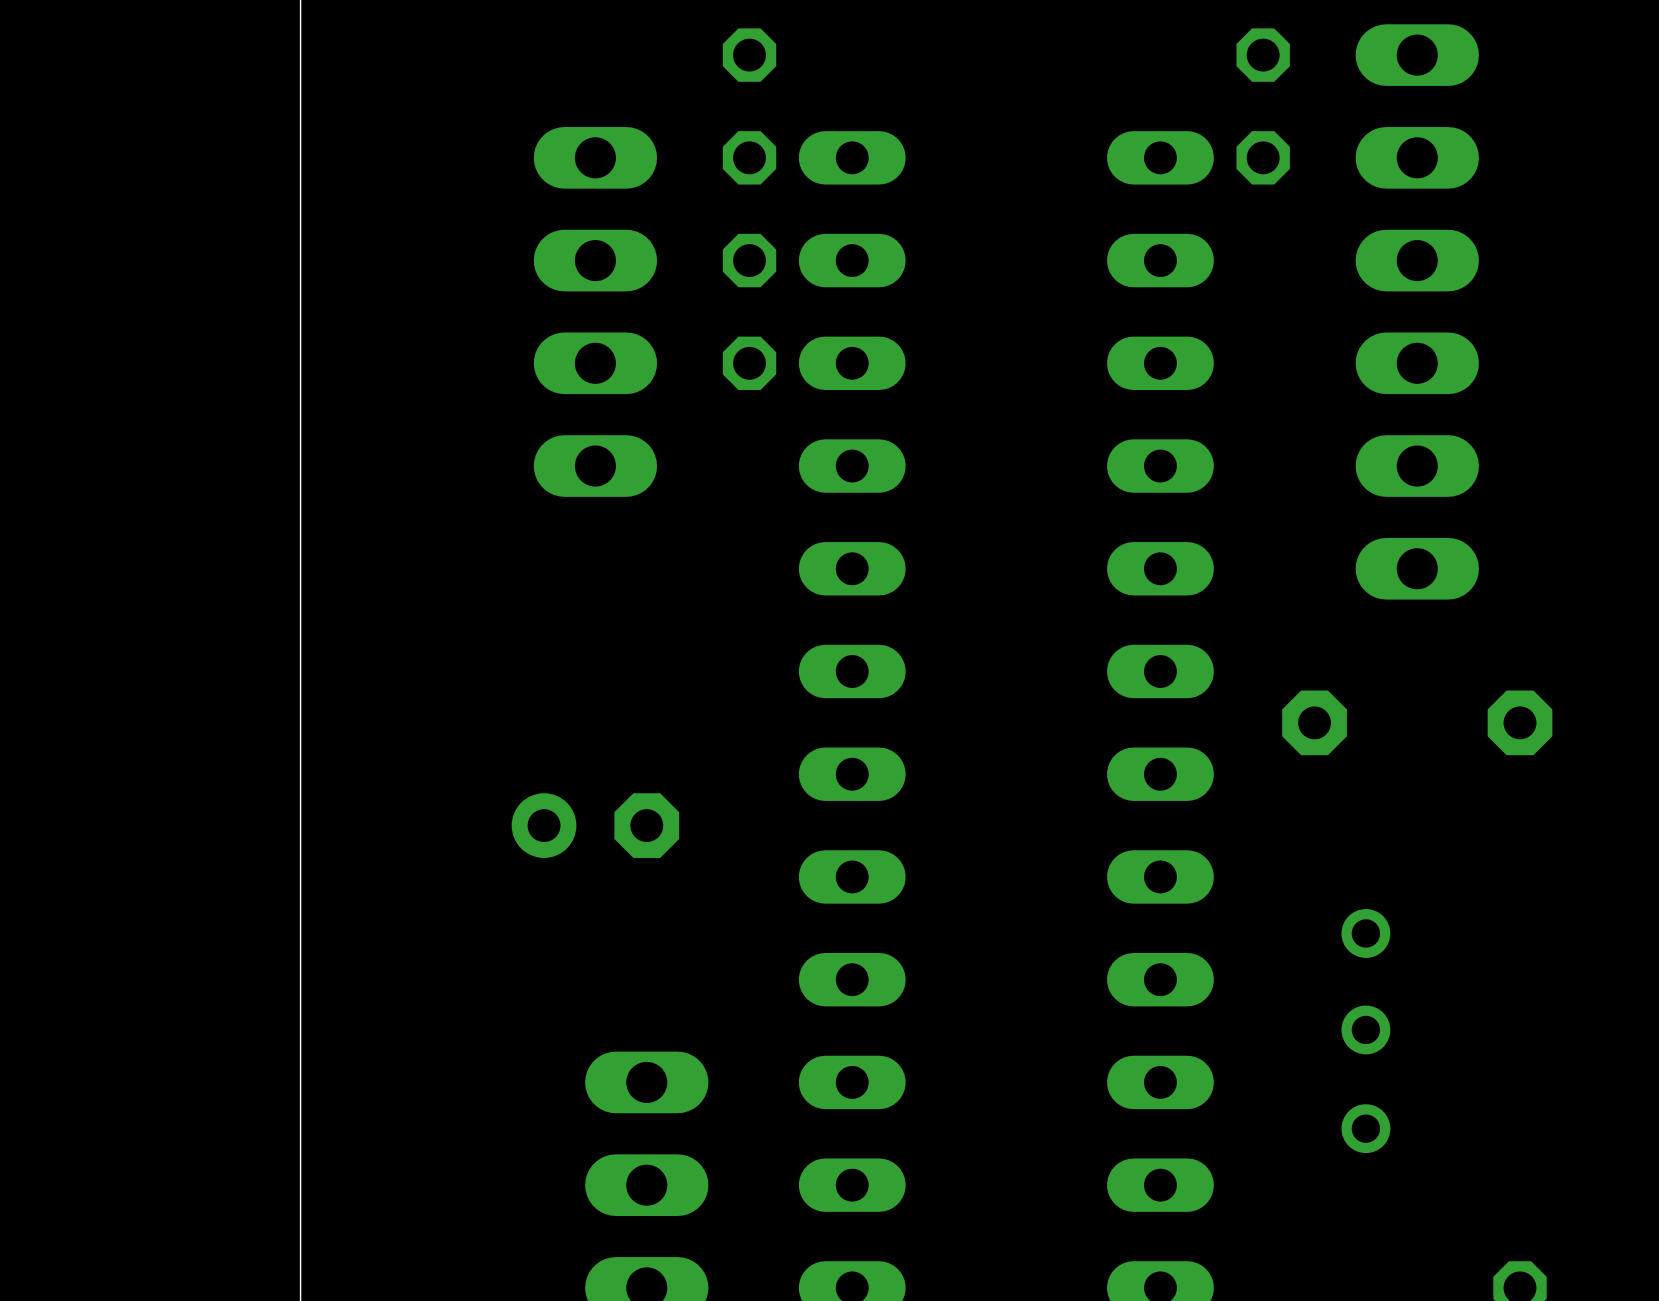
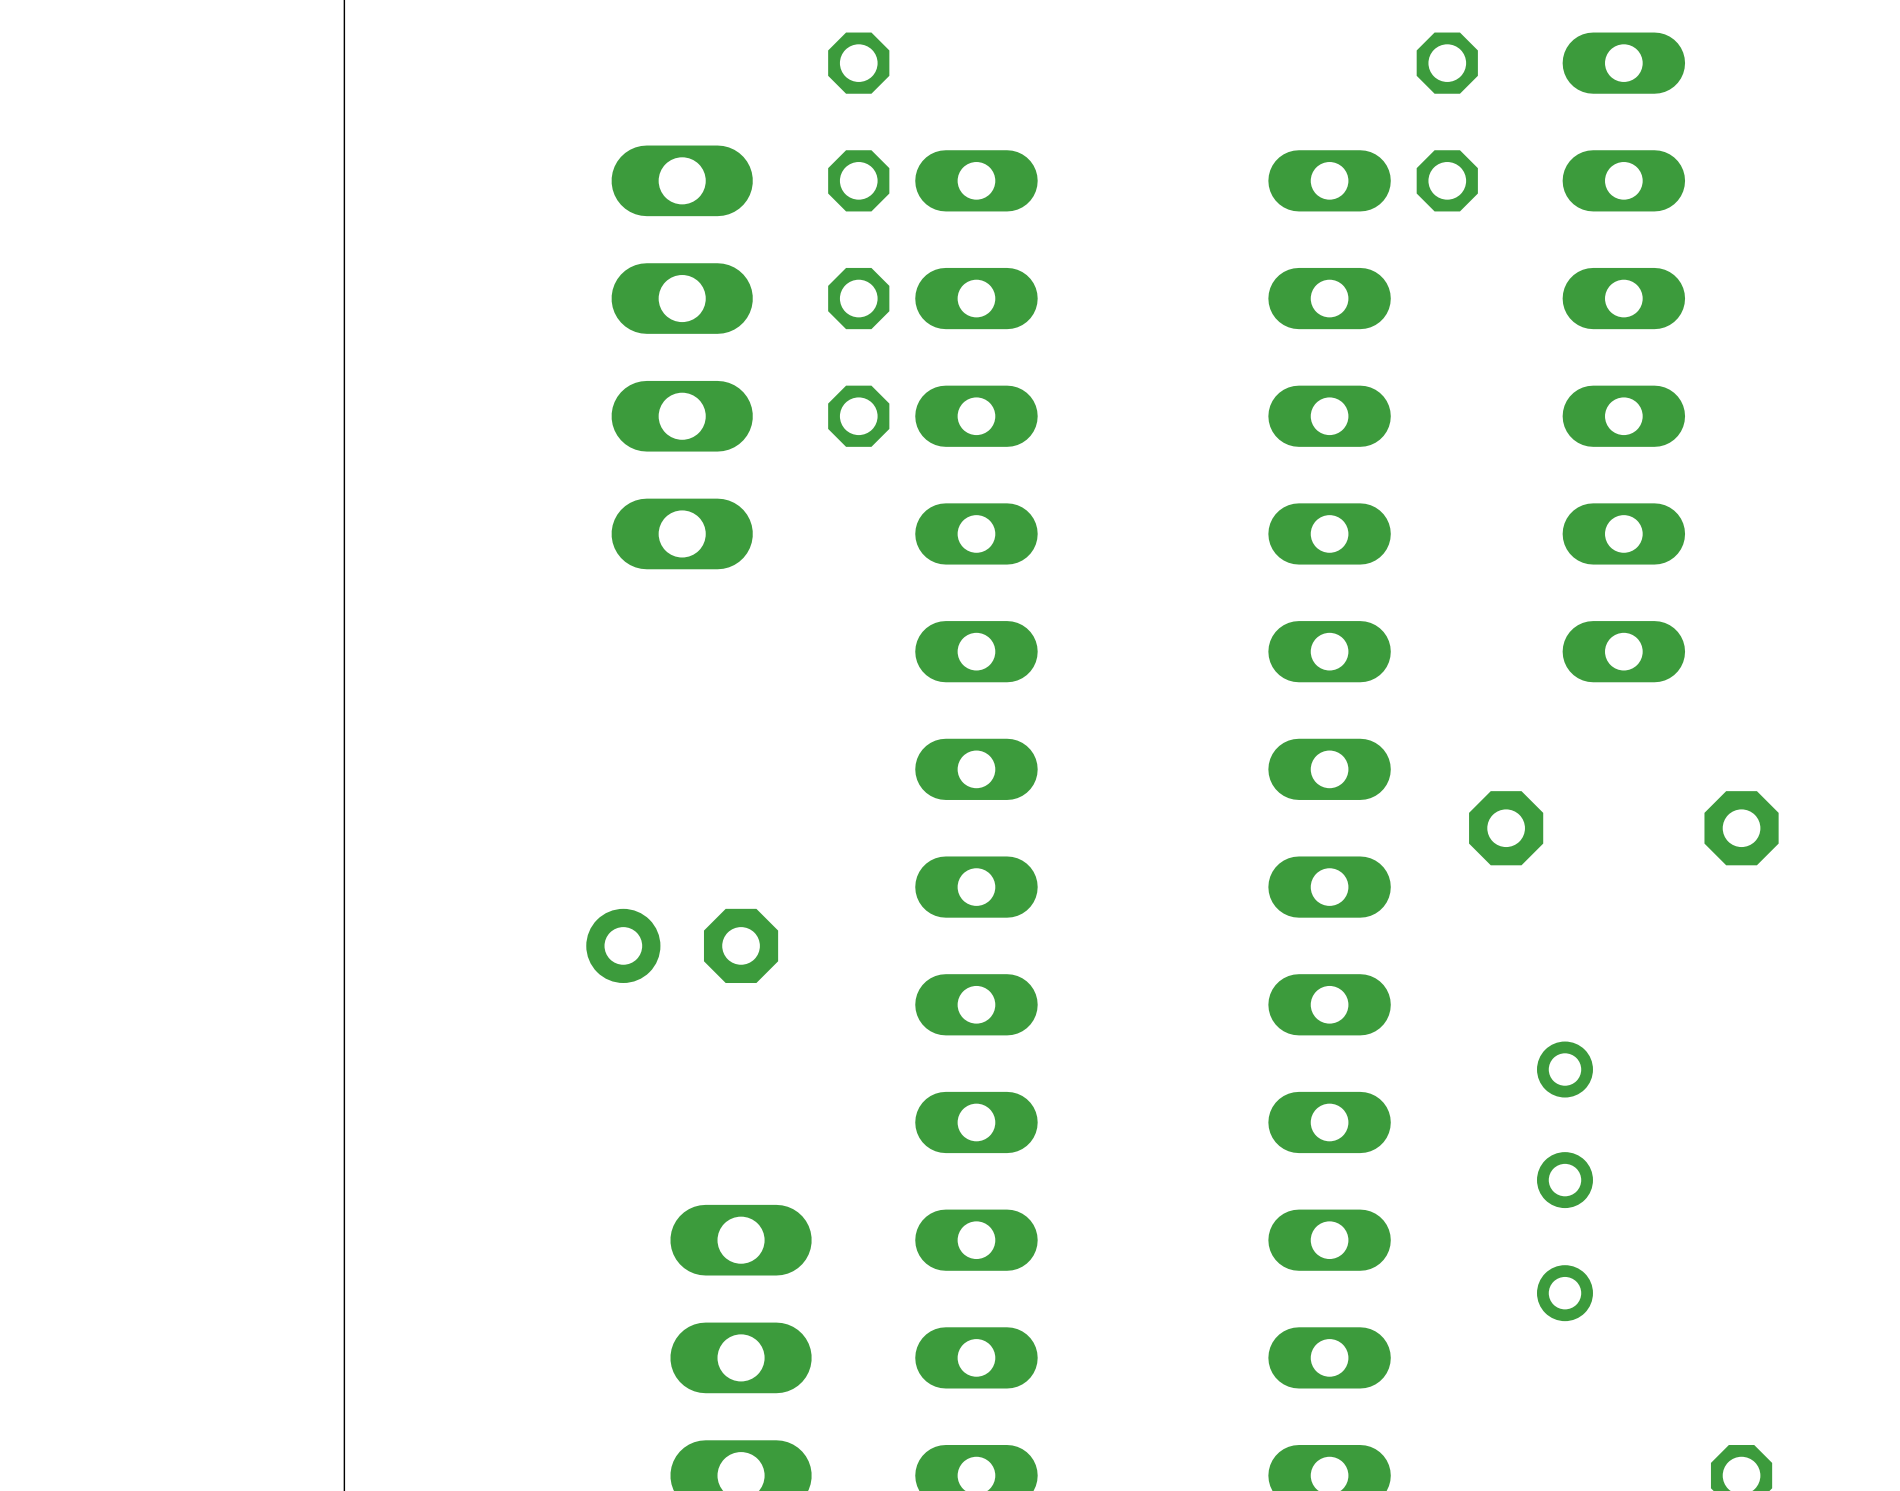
part footprint: [1355, 24, 1479, 600] -> [1562, 32, 1686, 683]

